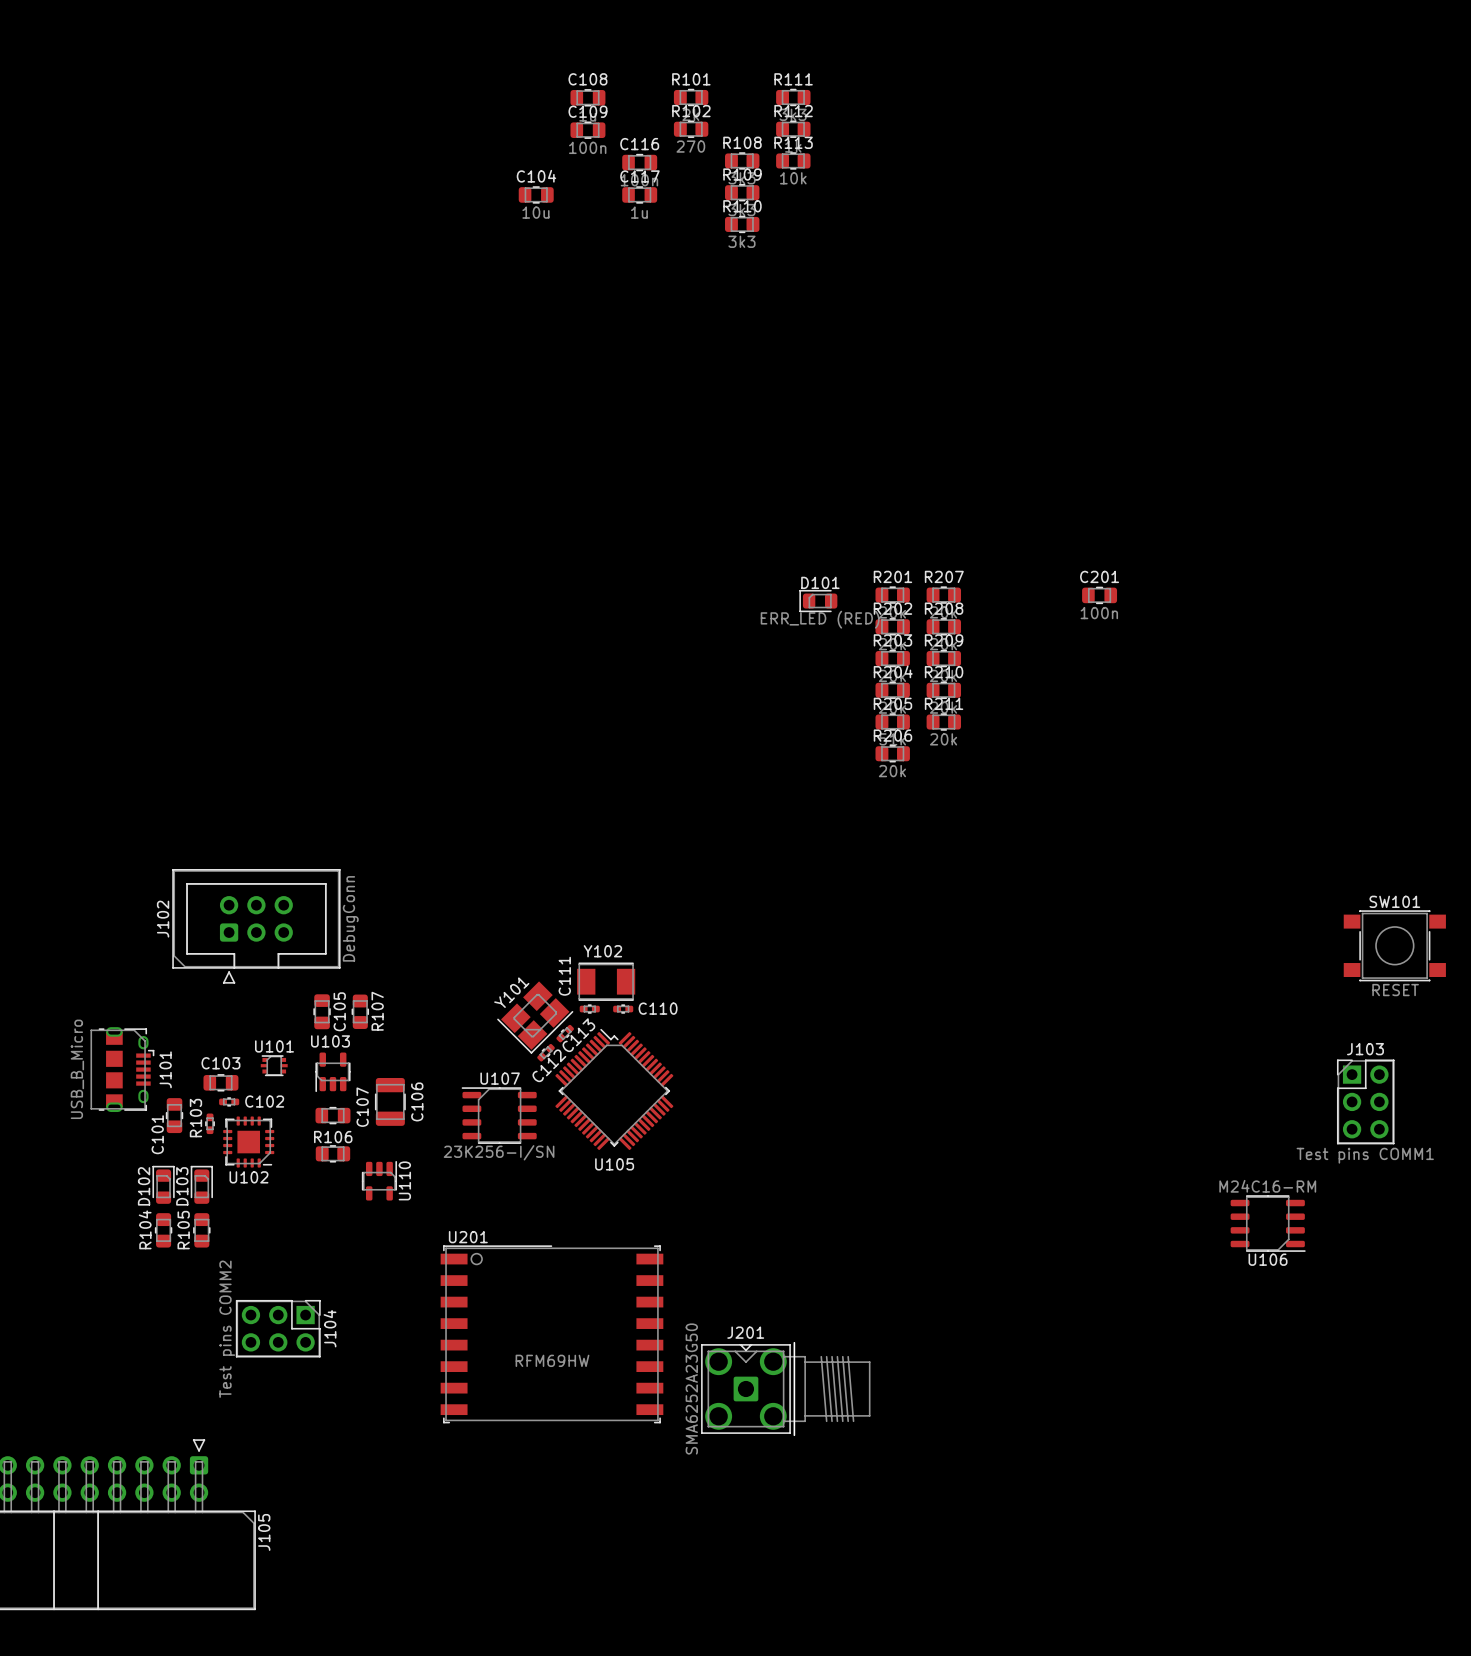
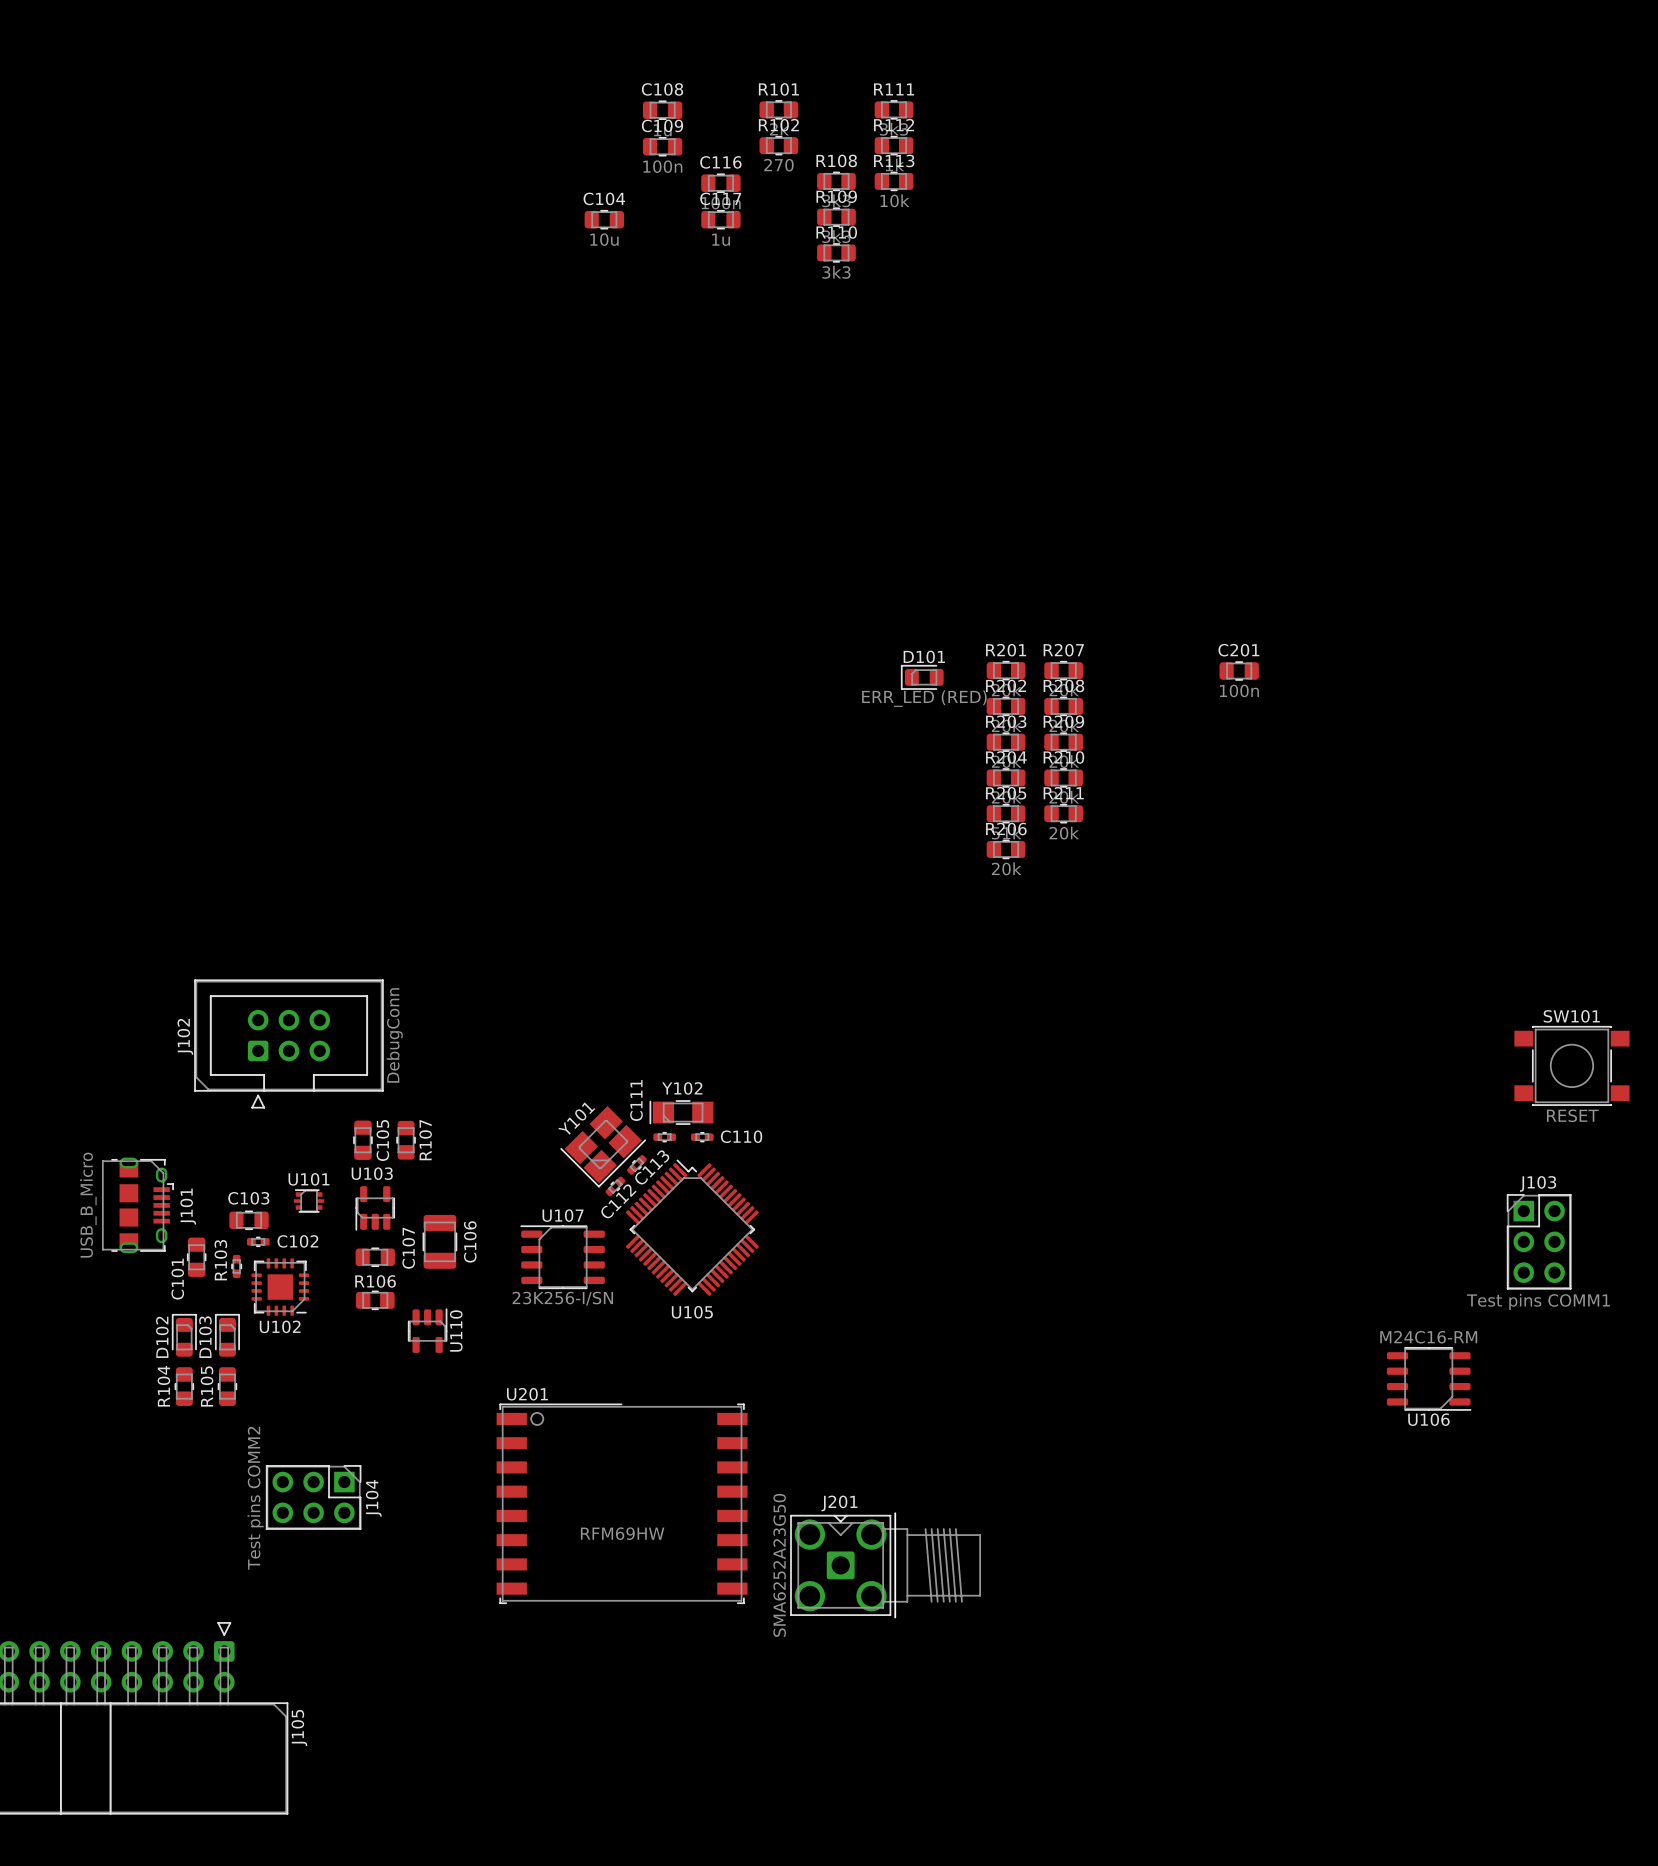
Y102 footprint: [577, 962, 636, 1001] -> [649, 1100, 714, 1125]

